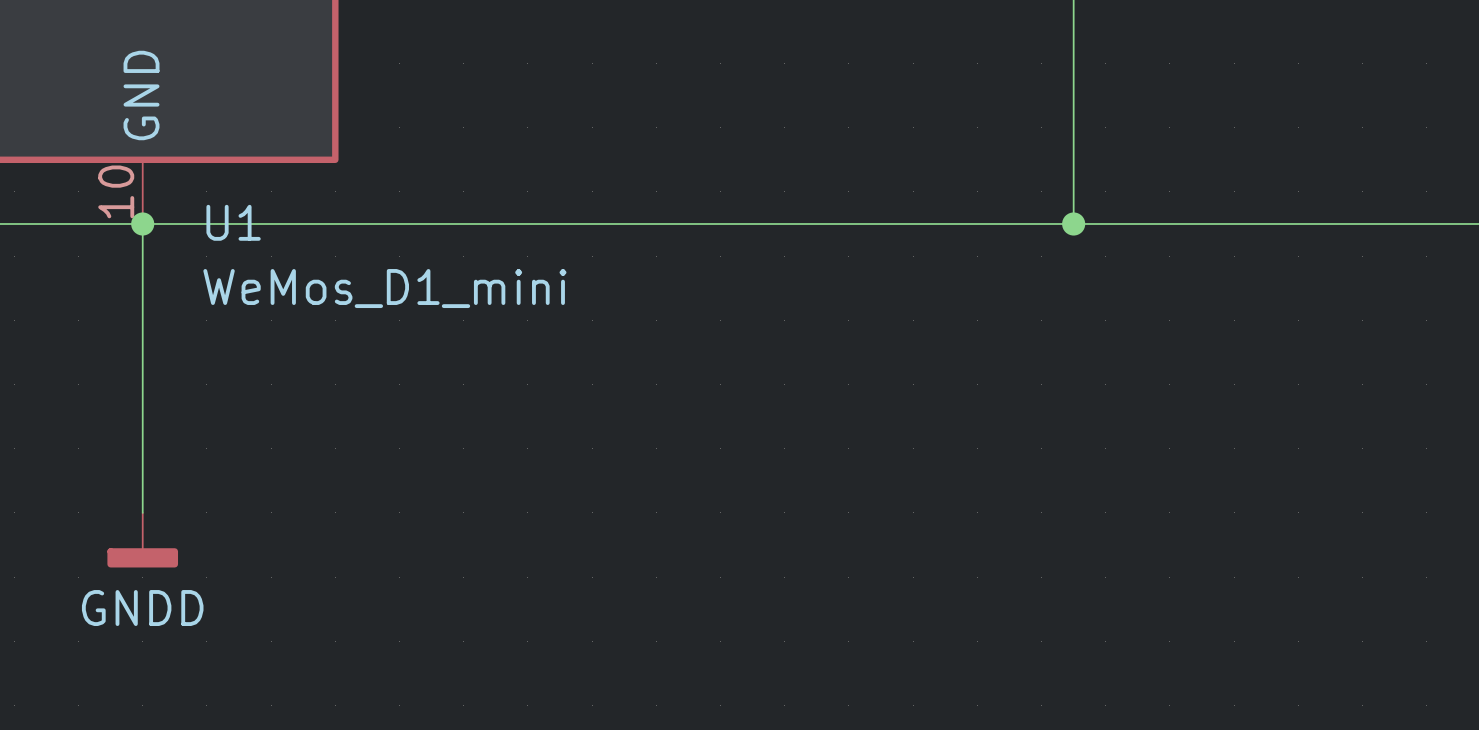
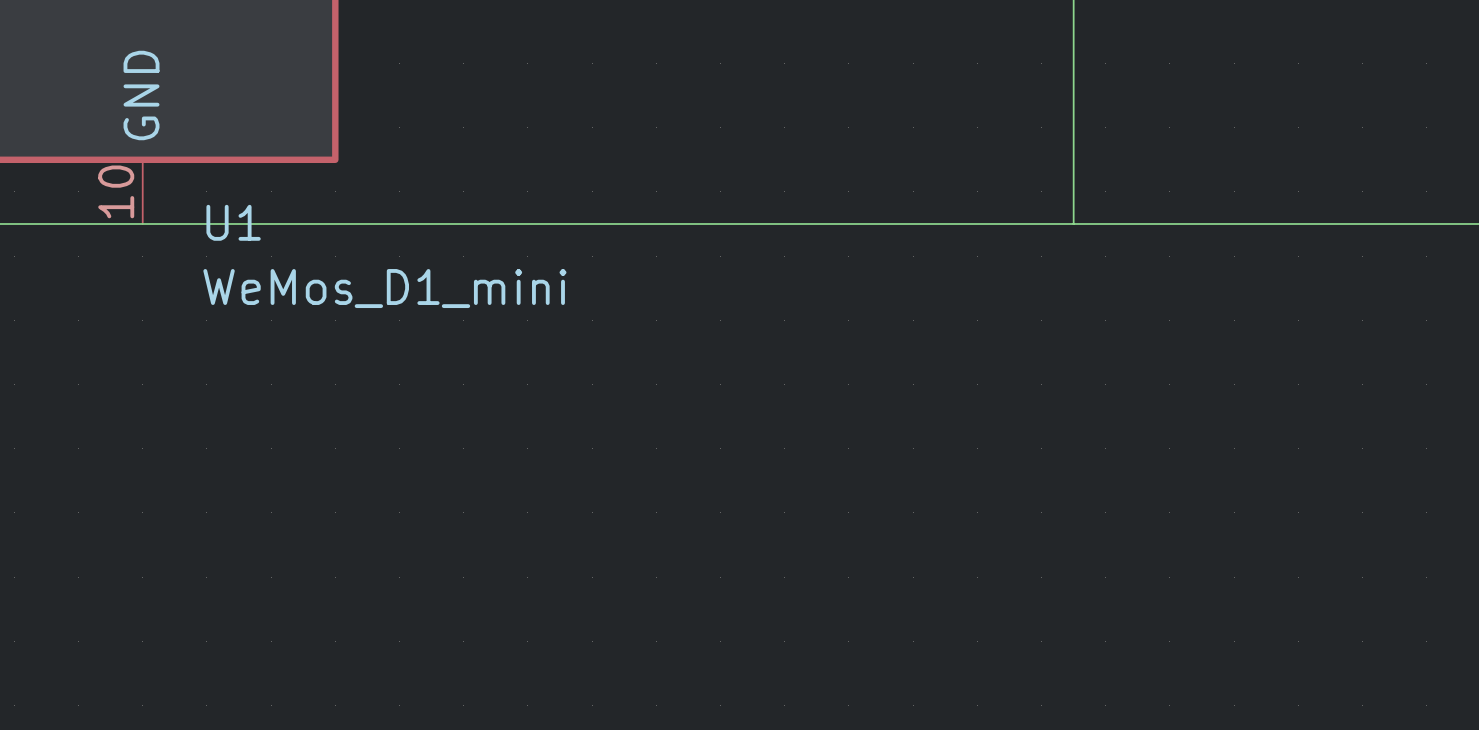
wire: (142, 223) (142, 512) -> none
junction: (142, 223) -> none
junction: (1073, 223) -> none
power symbol: GNDD (142, 540) -> none

